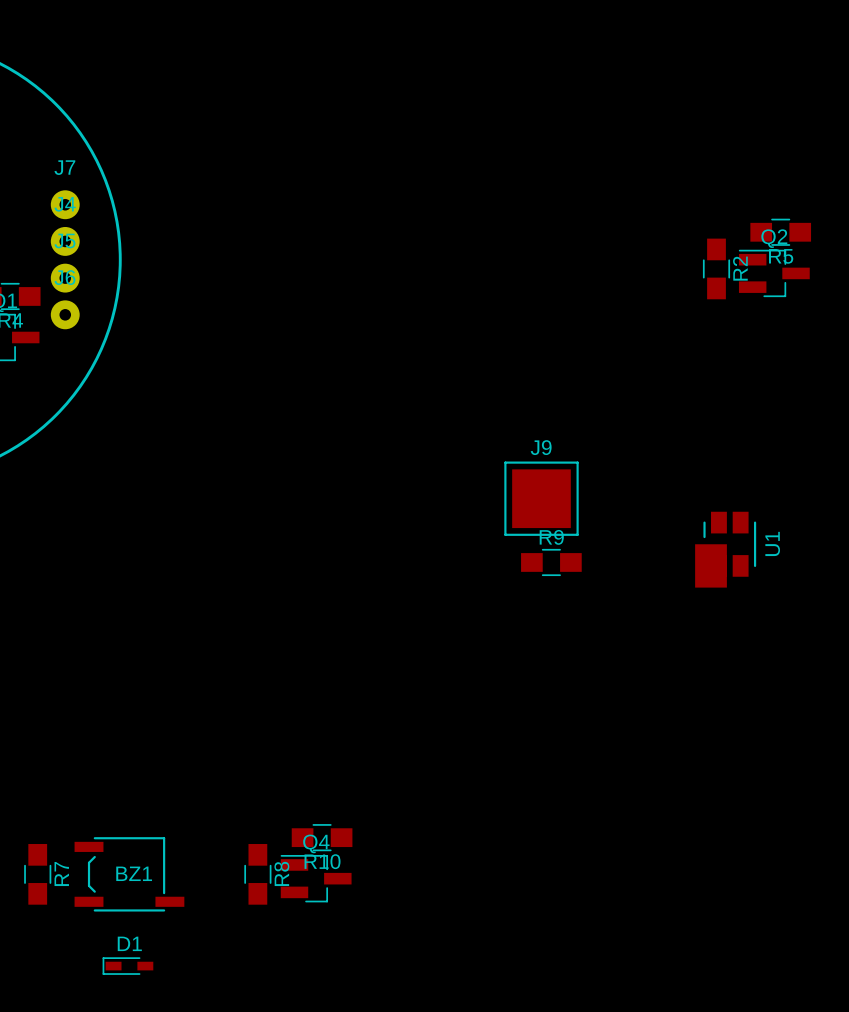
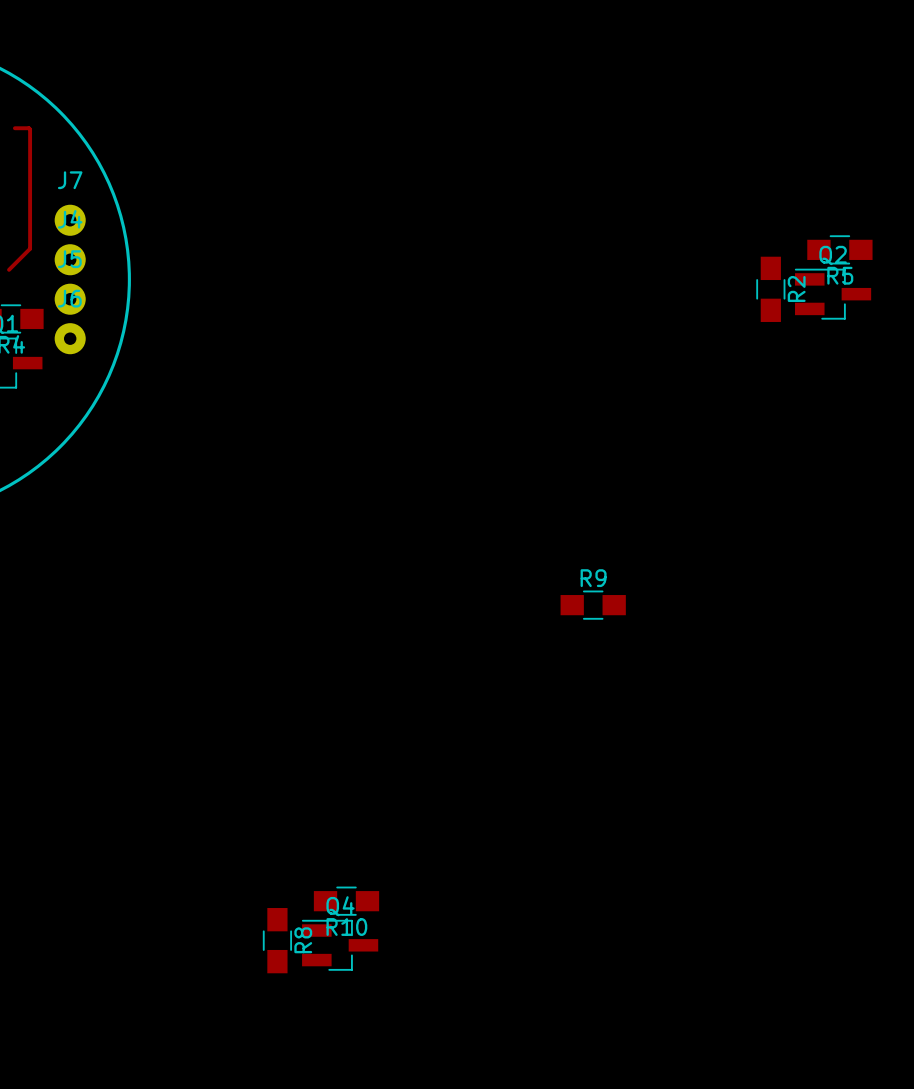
track: none -> (14, 128) (30, 129) (30, 248) (9, 269)
J9: (541, 498) -> none
U1: (725, 549) -> none
R7: (37, 874) -> none
BZ1: (129, 874) -> none
D1: (127, 966) -> none

